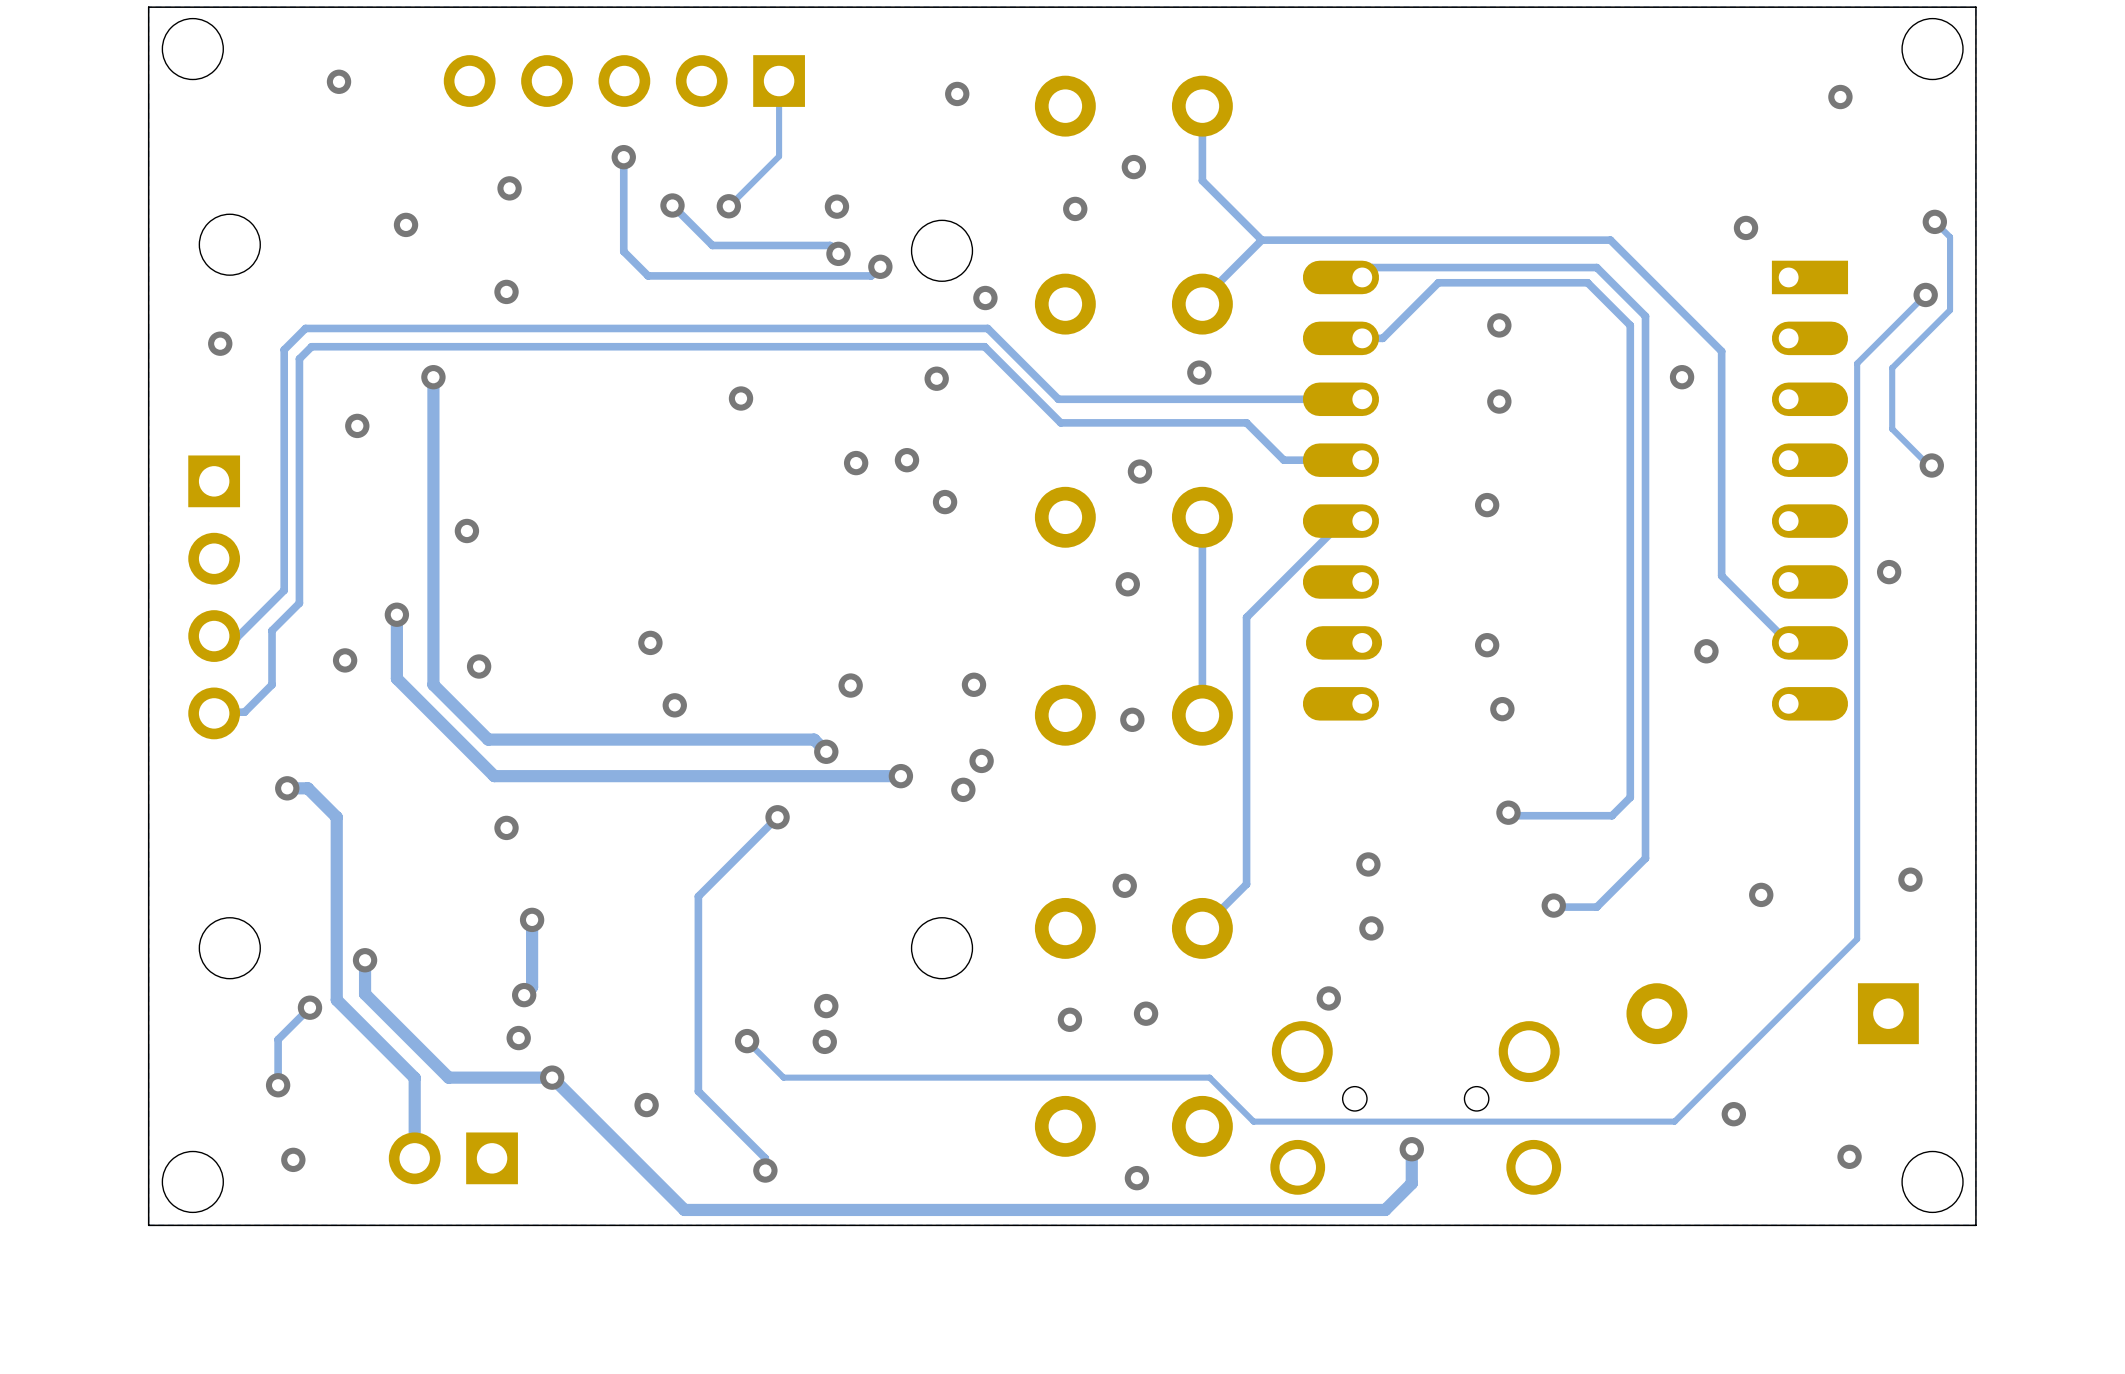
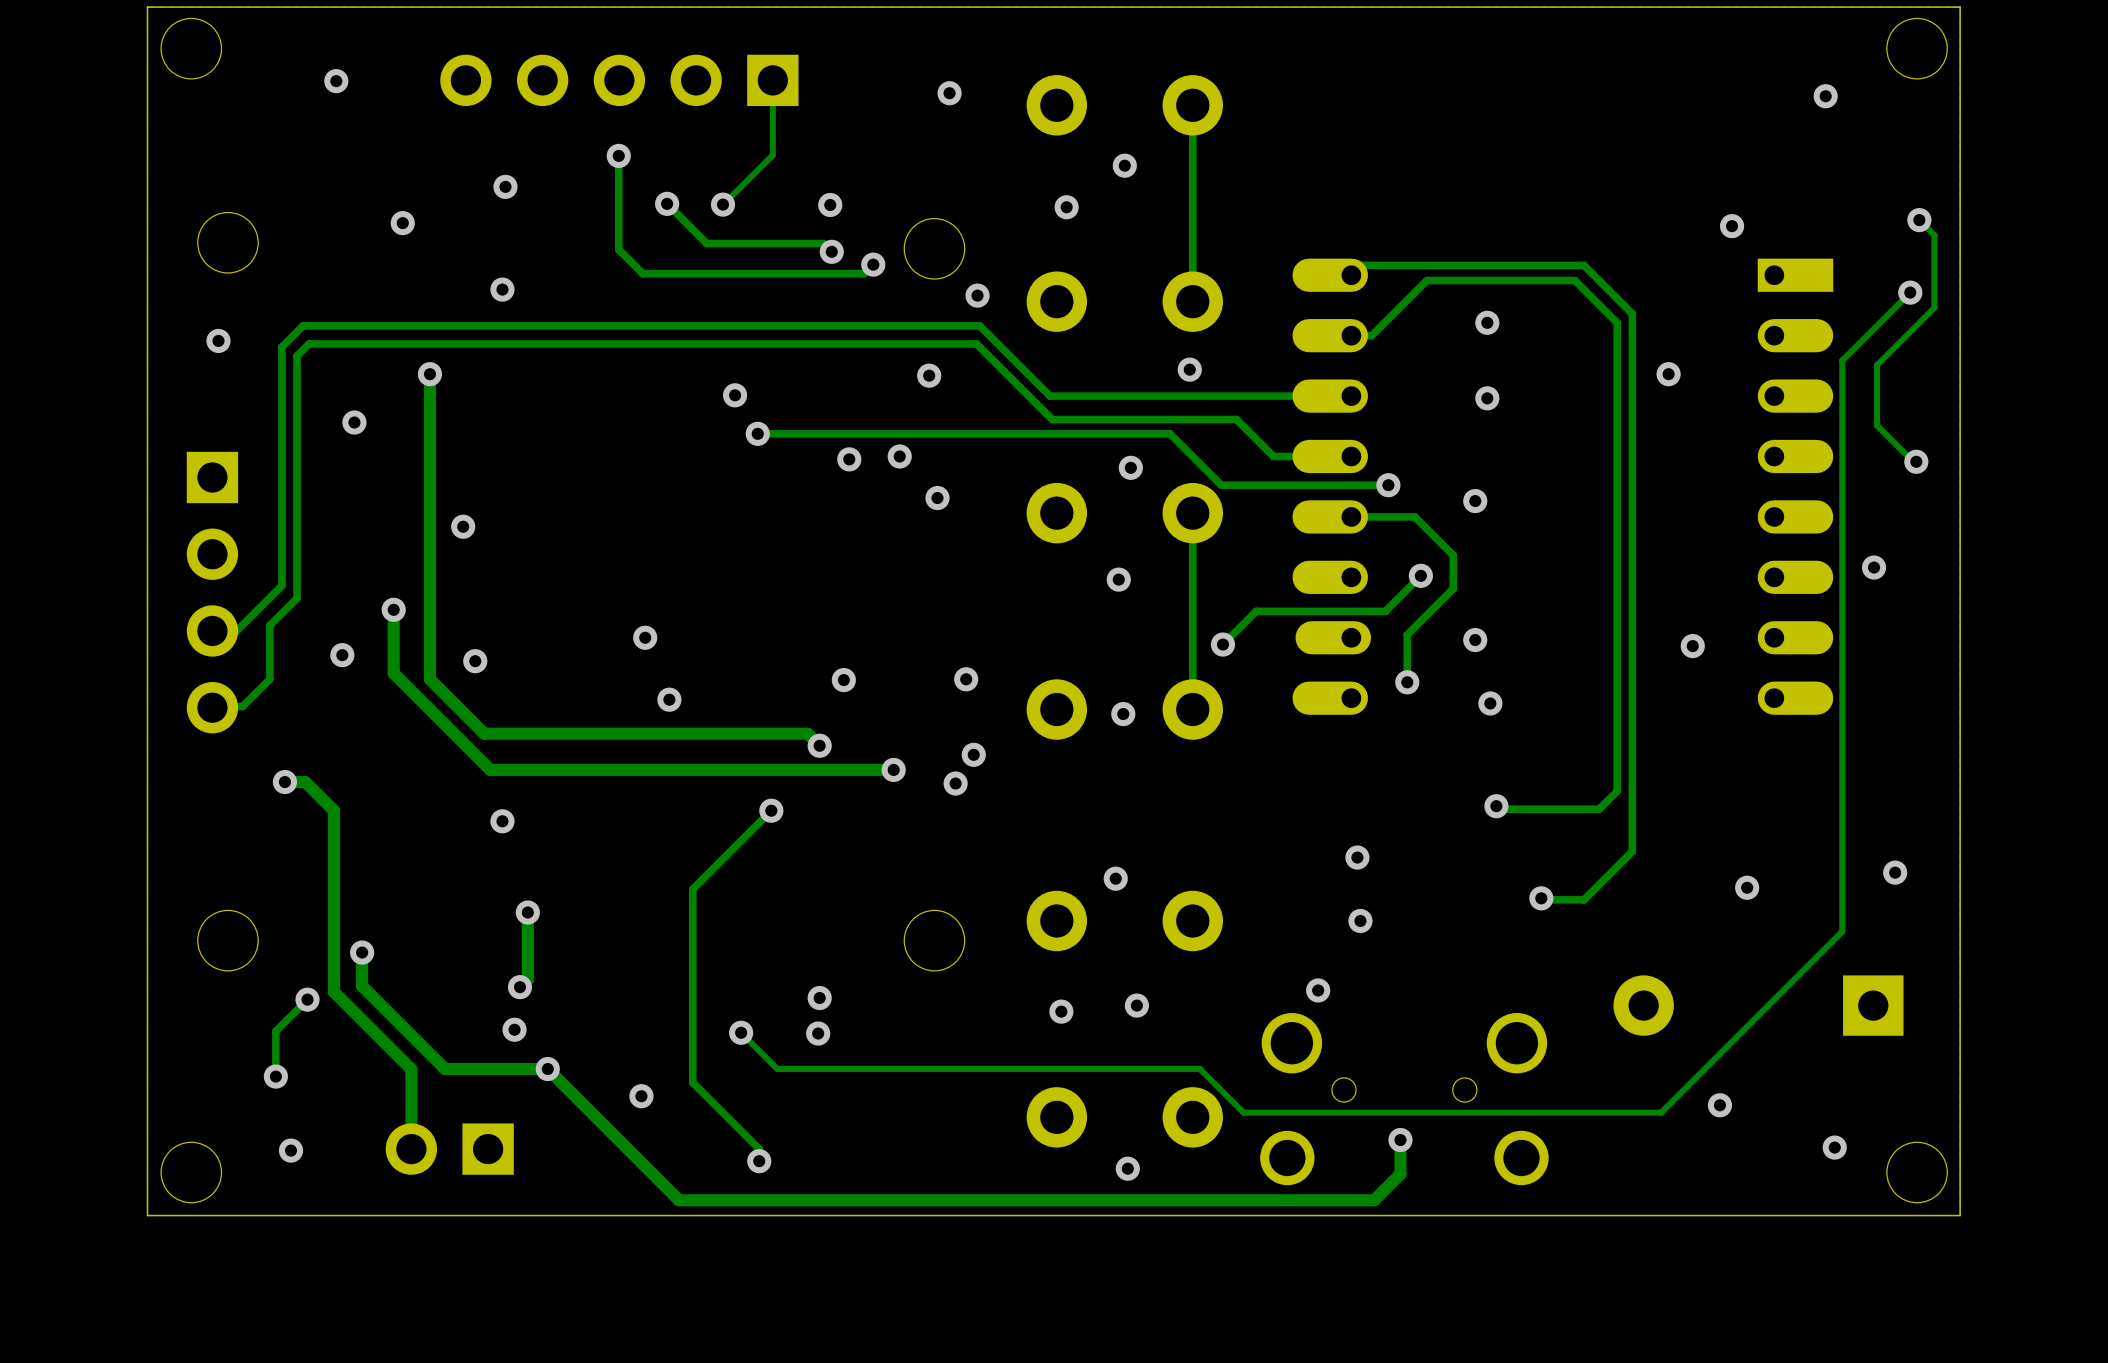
track: (1202, 180) (1261, 240) -> (1192, 179) (1192, 301)
track: (1261, 240) (1203, 298) (1203, 307) -> none
track: (1261, 240) (1610, 240) (1721, 351) (1721, 575) (1788, 642) -> none
track: none -> (757, 433) (1170, 433) (1221, 485) (1388, 485)
via: none -> (757, 433)
via: none -> (1388, 485)
track: (1362, 521) (1342, 521) (1246, 617) (1246, 884) (1202, 928) -> (1351, 516) (1414, 516) (1453, 555) (1453, 588) (1407, 634) (1407, 682)
track: none -> (1420, 575) (1385, 611) (1256, 611) (1222, 644)
via: none -> (1420, 575)
via: none -> (1222, 644)
via: none -> (1407, 682)

